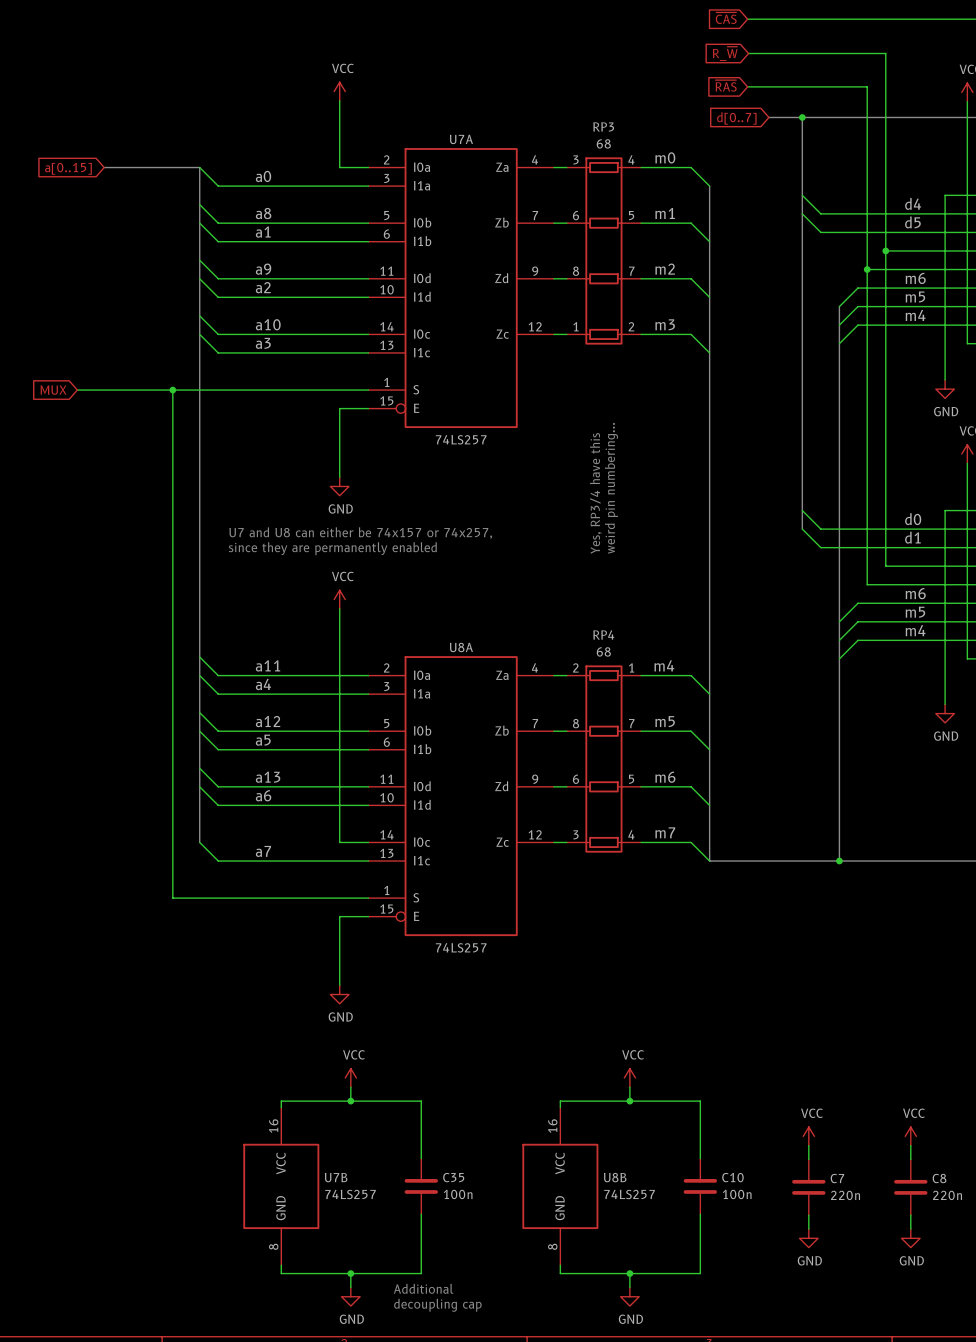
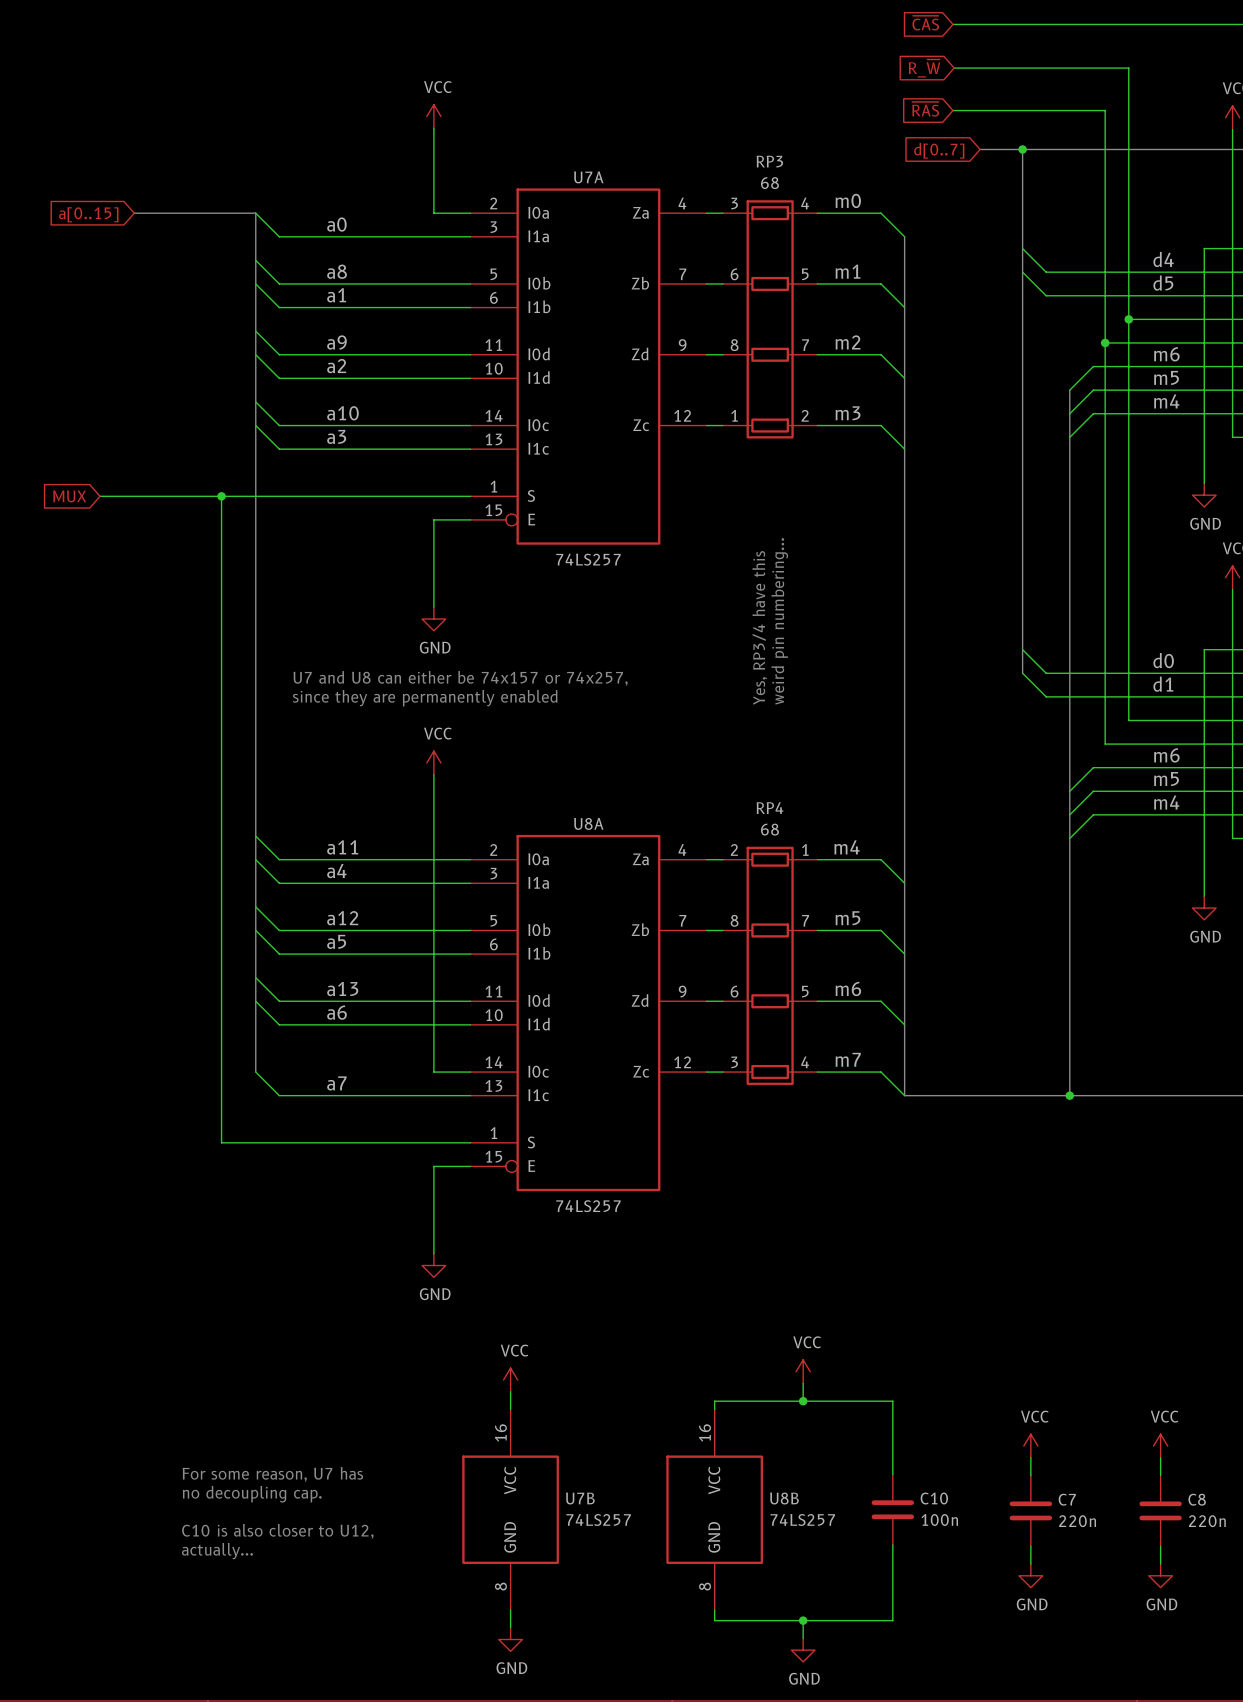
power symbol position: VCC (350, 1077) -> VCC (510, 1379)
wire: (350, 1087) (350, 1101) -> (510, 1391) (510, 1409)
junction: (350, 1101) -> none
wire: (281, 1107) (281, 1101) (421, 1101) (421, 1158) -> none
text: none -> For some reason, U7 has (272, 1474)
text: none -> no decoupling cap. (252, 1494)
U7B position: (281, 1186) -> (510, 1509)
C35: 100n (421, 1186) -> none
text: none -> C10 is also closer to U12, (277, 1531)
wire: (421, 1214) (421, 1273) (281, 1273) (281, 1265) -> none
text: none -> actually... (217, 1551)
wire: (350, 1273) (350, 1287) -> (510, 1610) (510, 1627)
junction: (350, 1273) -> none
text: Additional (423, 1288) -> none
power symbol position: GND (350, 1296) -> GND (510, 1639)
text: decoupling cap (437, 1305) -> none

